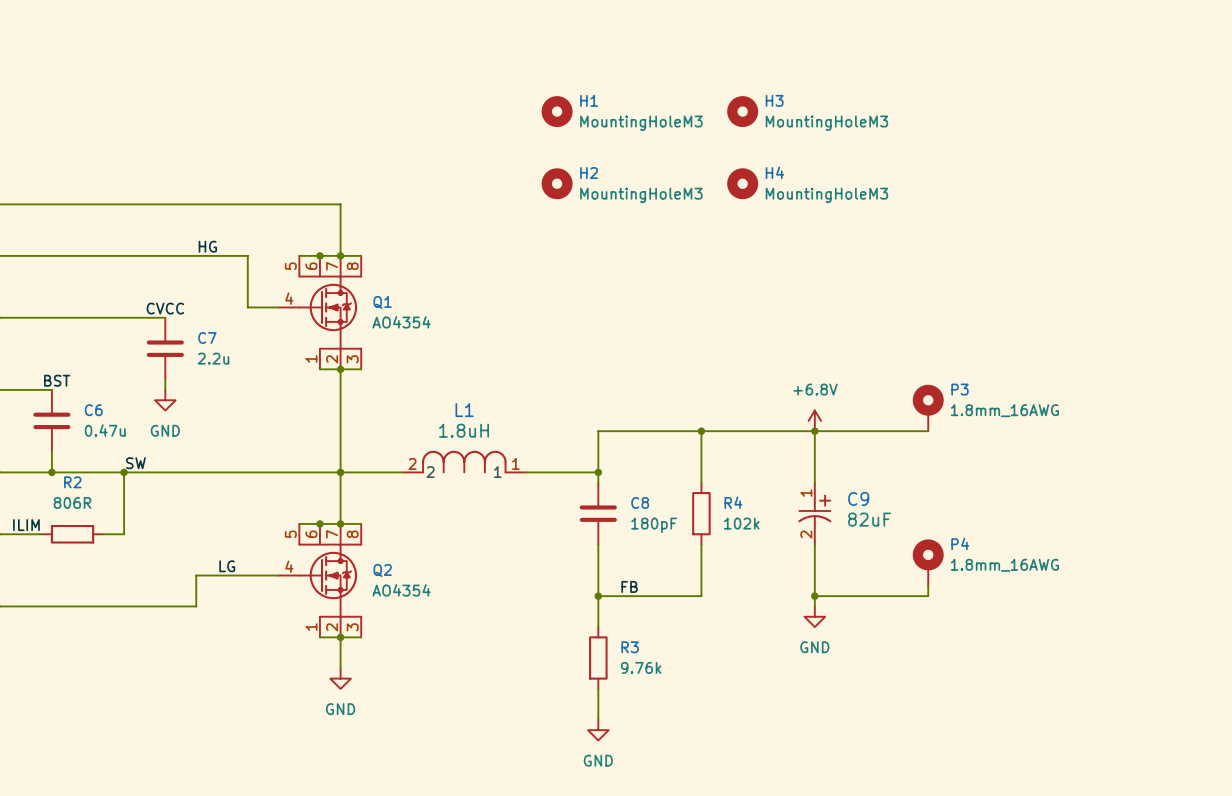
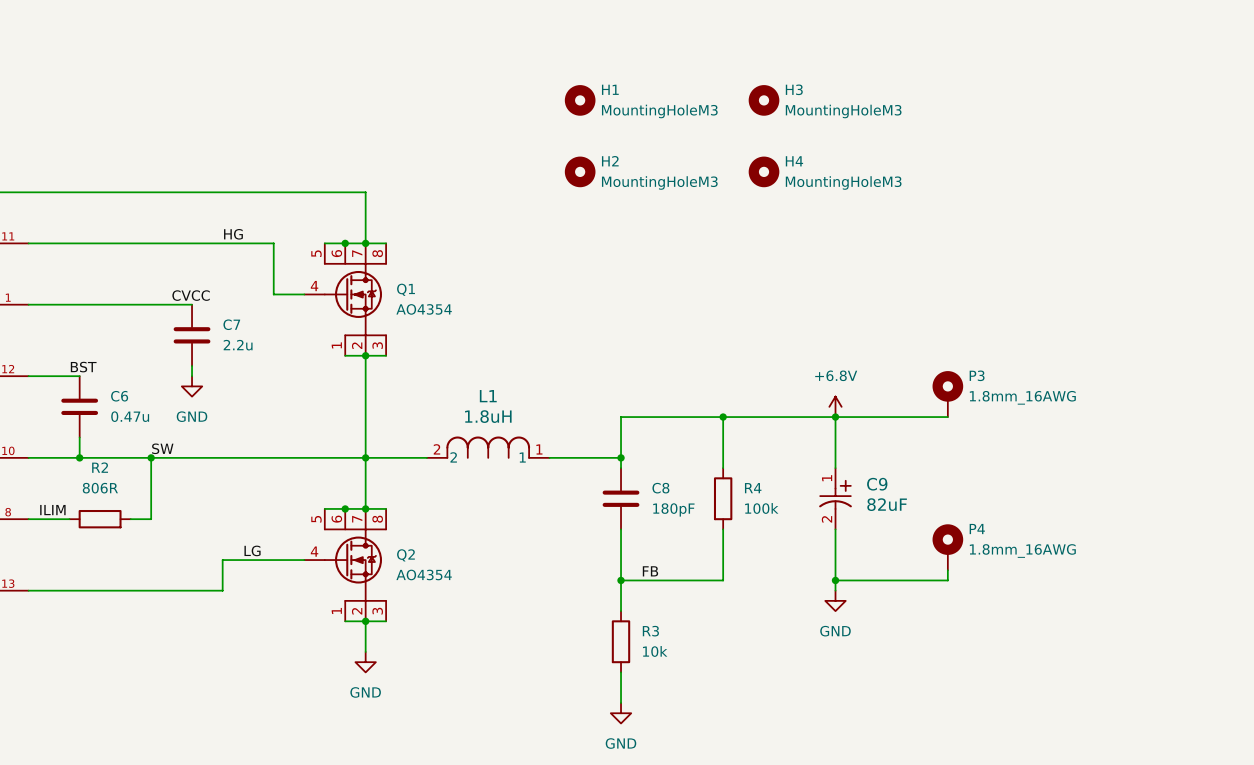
R4 value: 102k (741, 523) -> 100k (761, 508)
R3 value: 9.76k (641, 667) -> 10k (655, 651)

